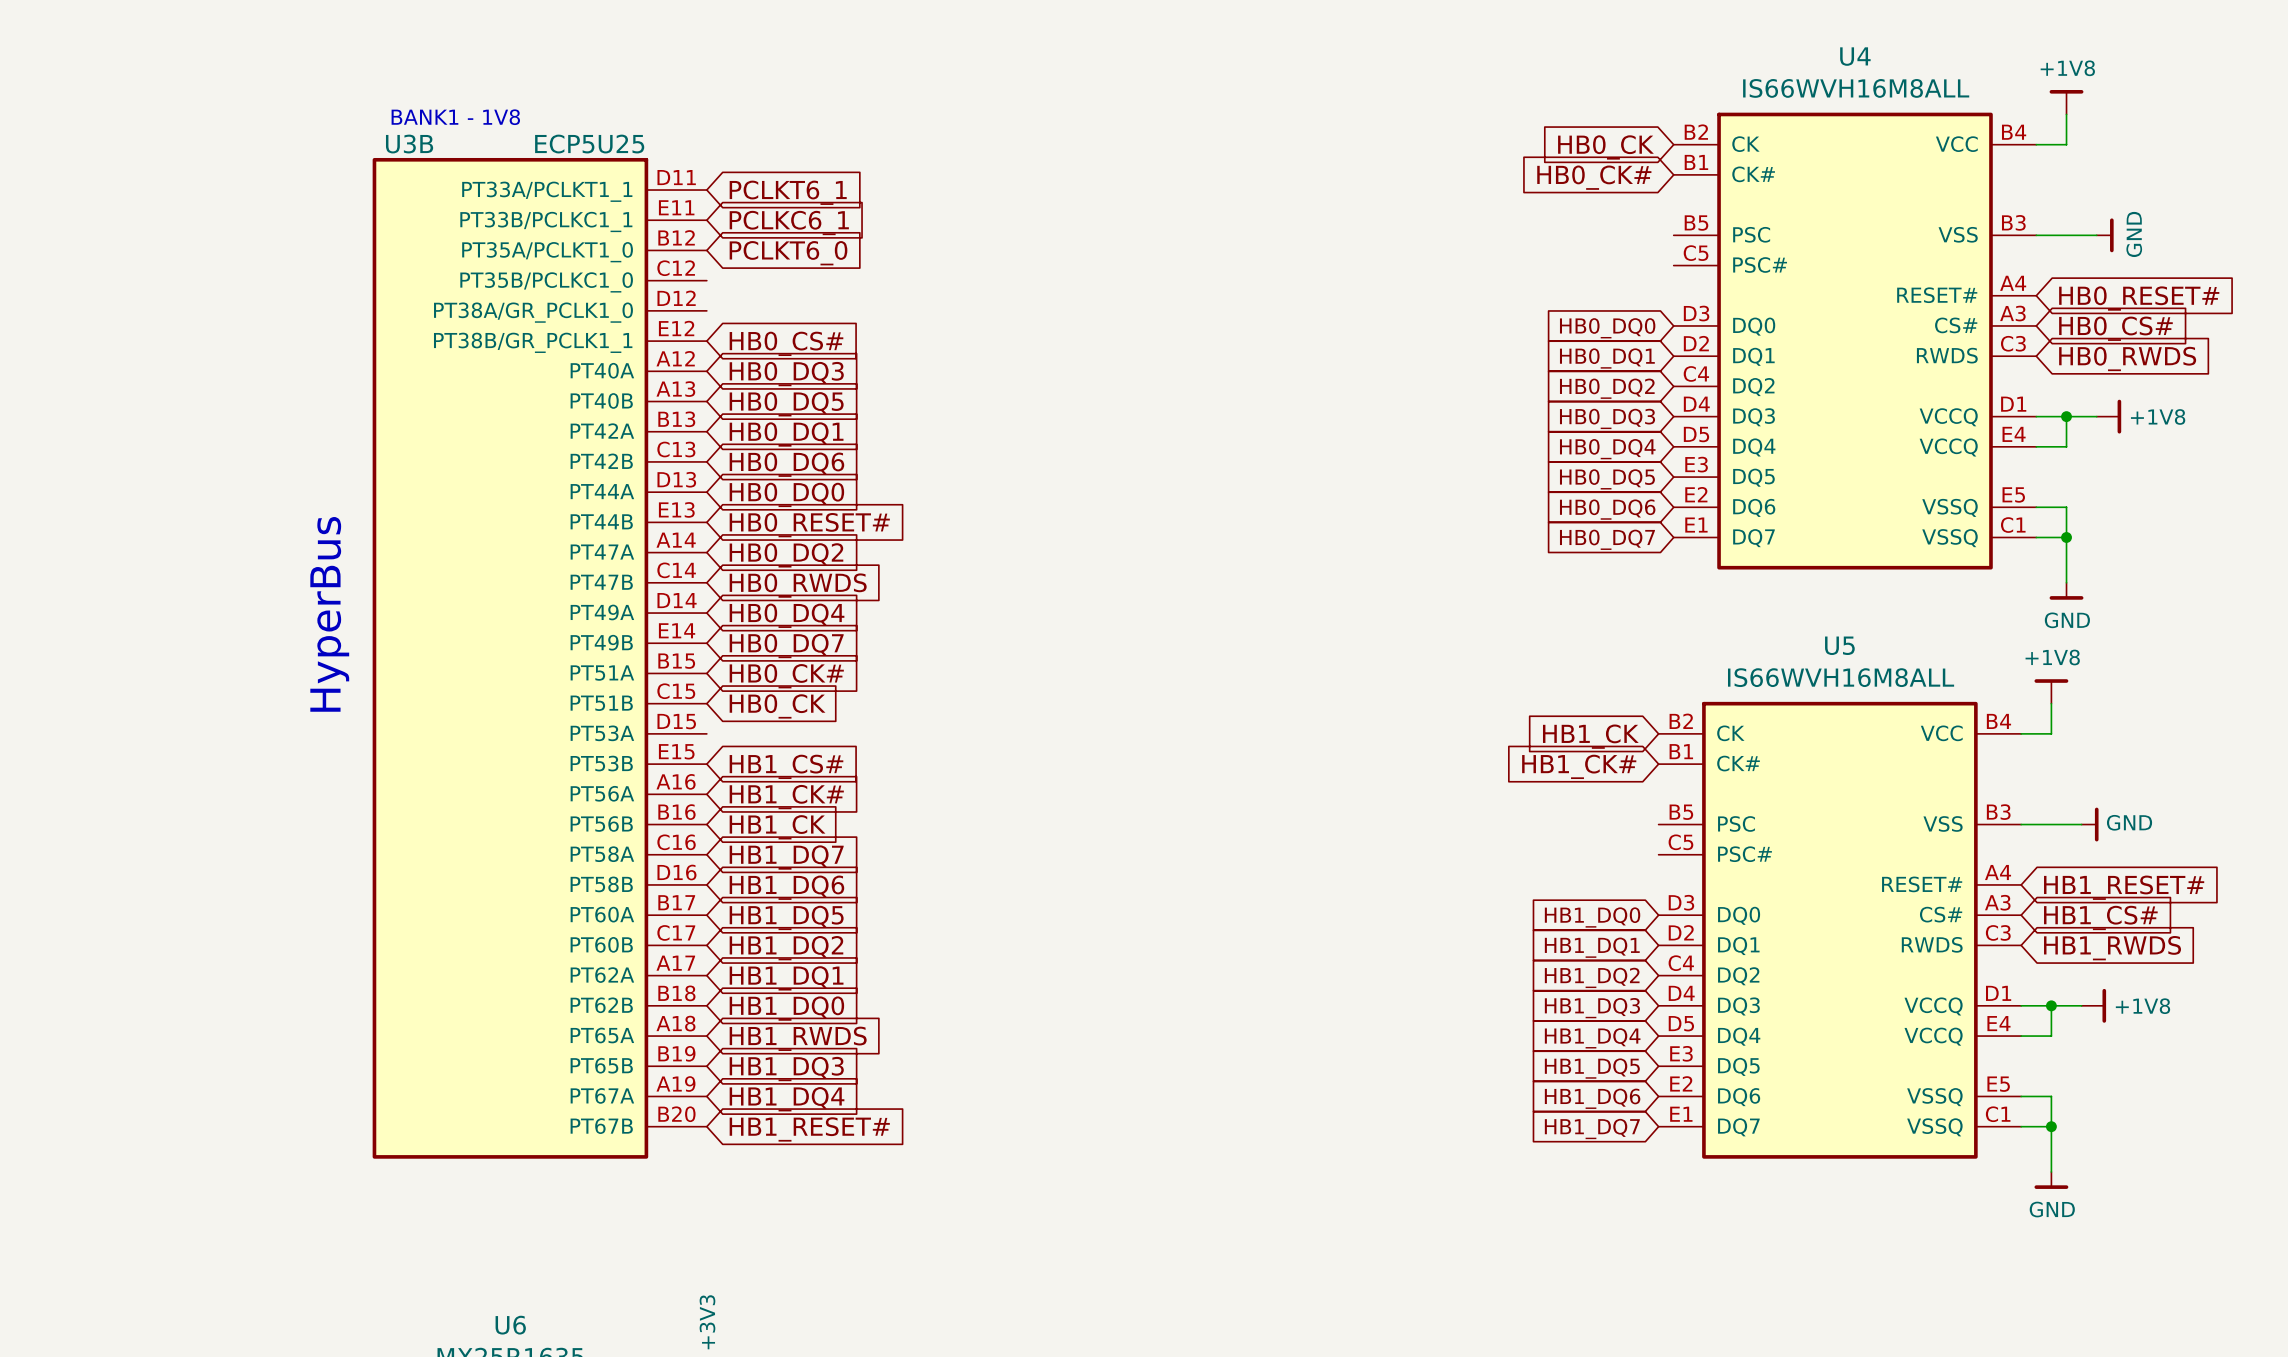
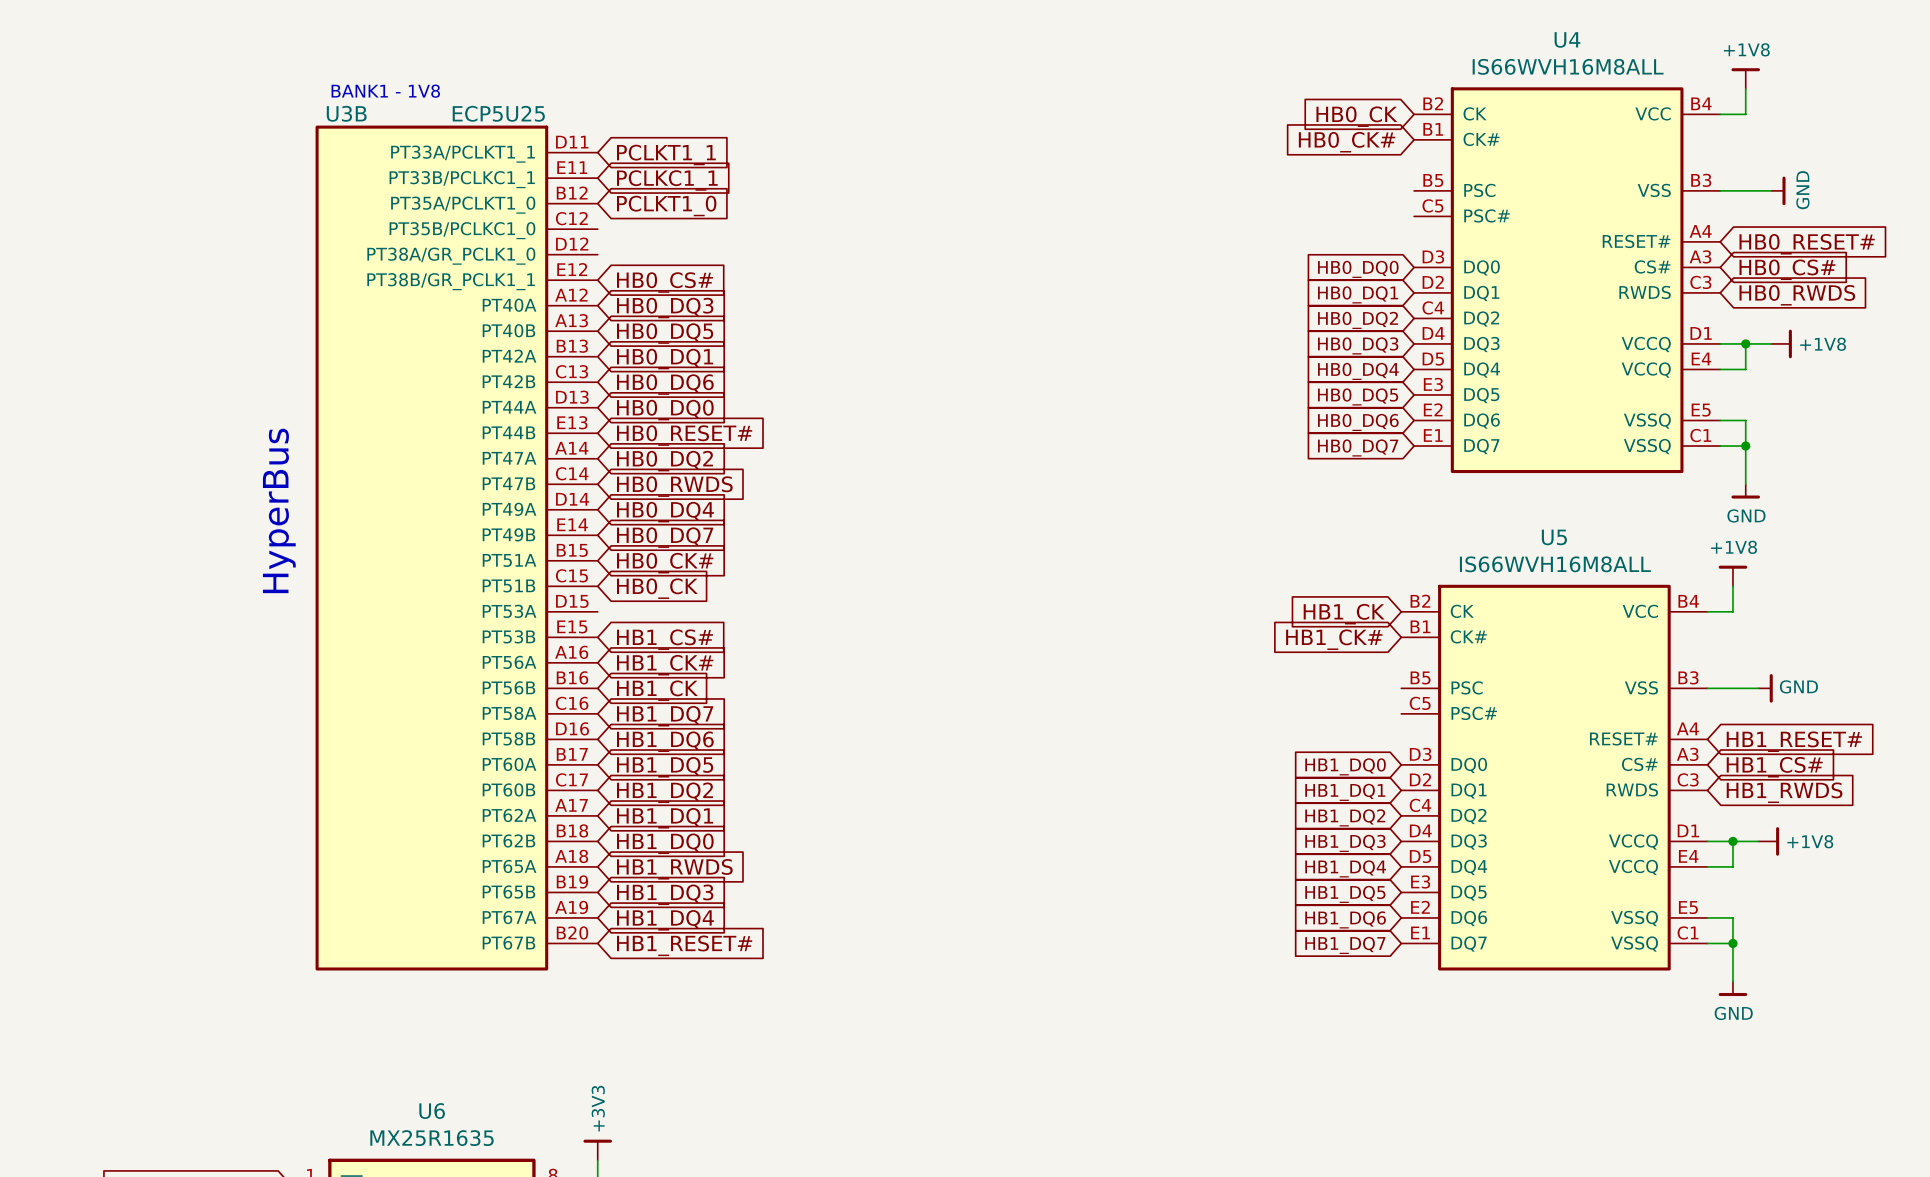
global label: PCLKT6_1 (788, 192) -> PCLKT1_1 (666, 154)
global label: PCLKC6_1 (789, 223) -> PCLKC1_1 (667, 180)
global label: PCLKT6_0 (788, 253) -> PCLKT1_0 (666, 205)

